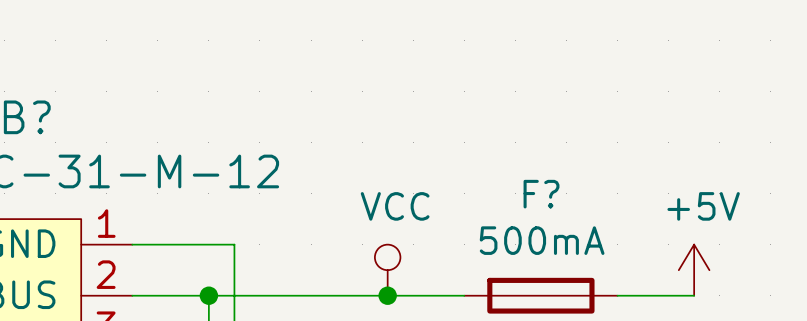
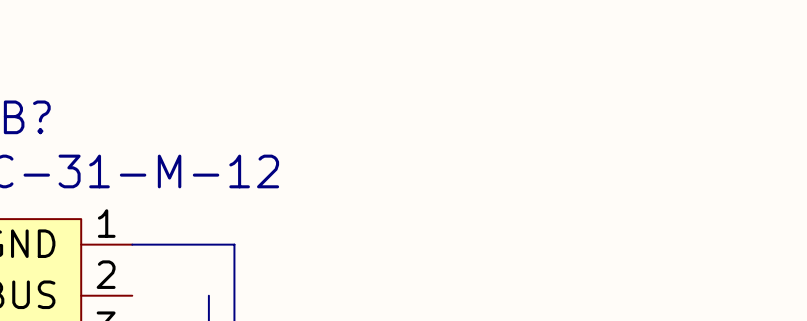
power symbol: VCC (387, 270) -> none
power symbol: +5V (694, 270) -> none
wire: (132, 295) (464, 295) -> none
junction: (208, 295) -> none
junction: (387, 295) -> none
F?: 500mA (540, 295) -> none
wire: (617, 295) (694, 295) -> none

